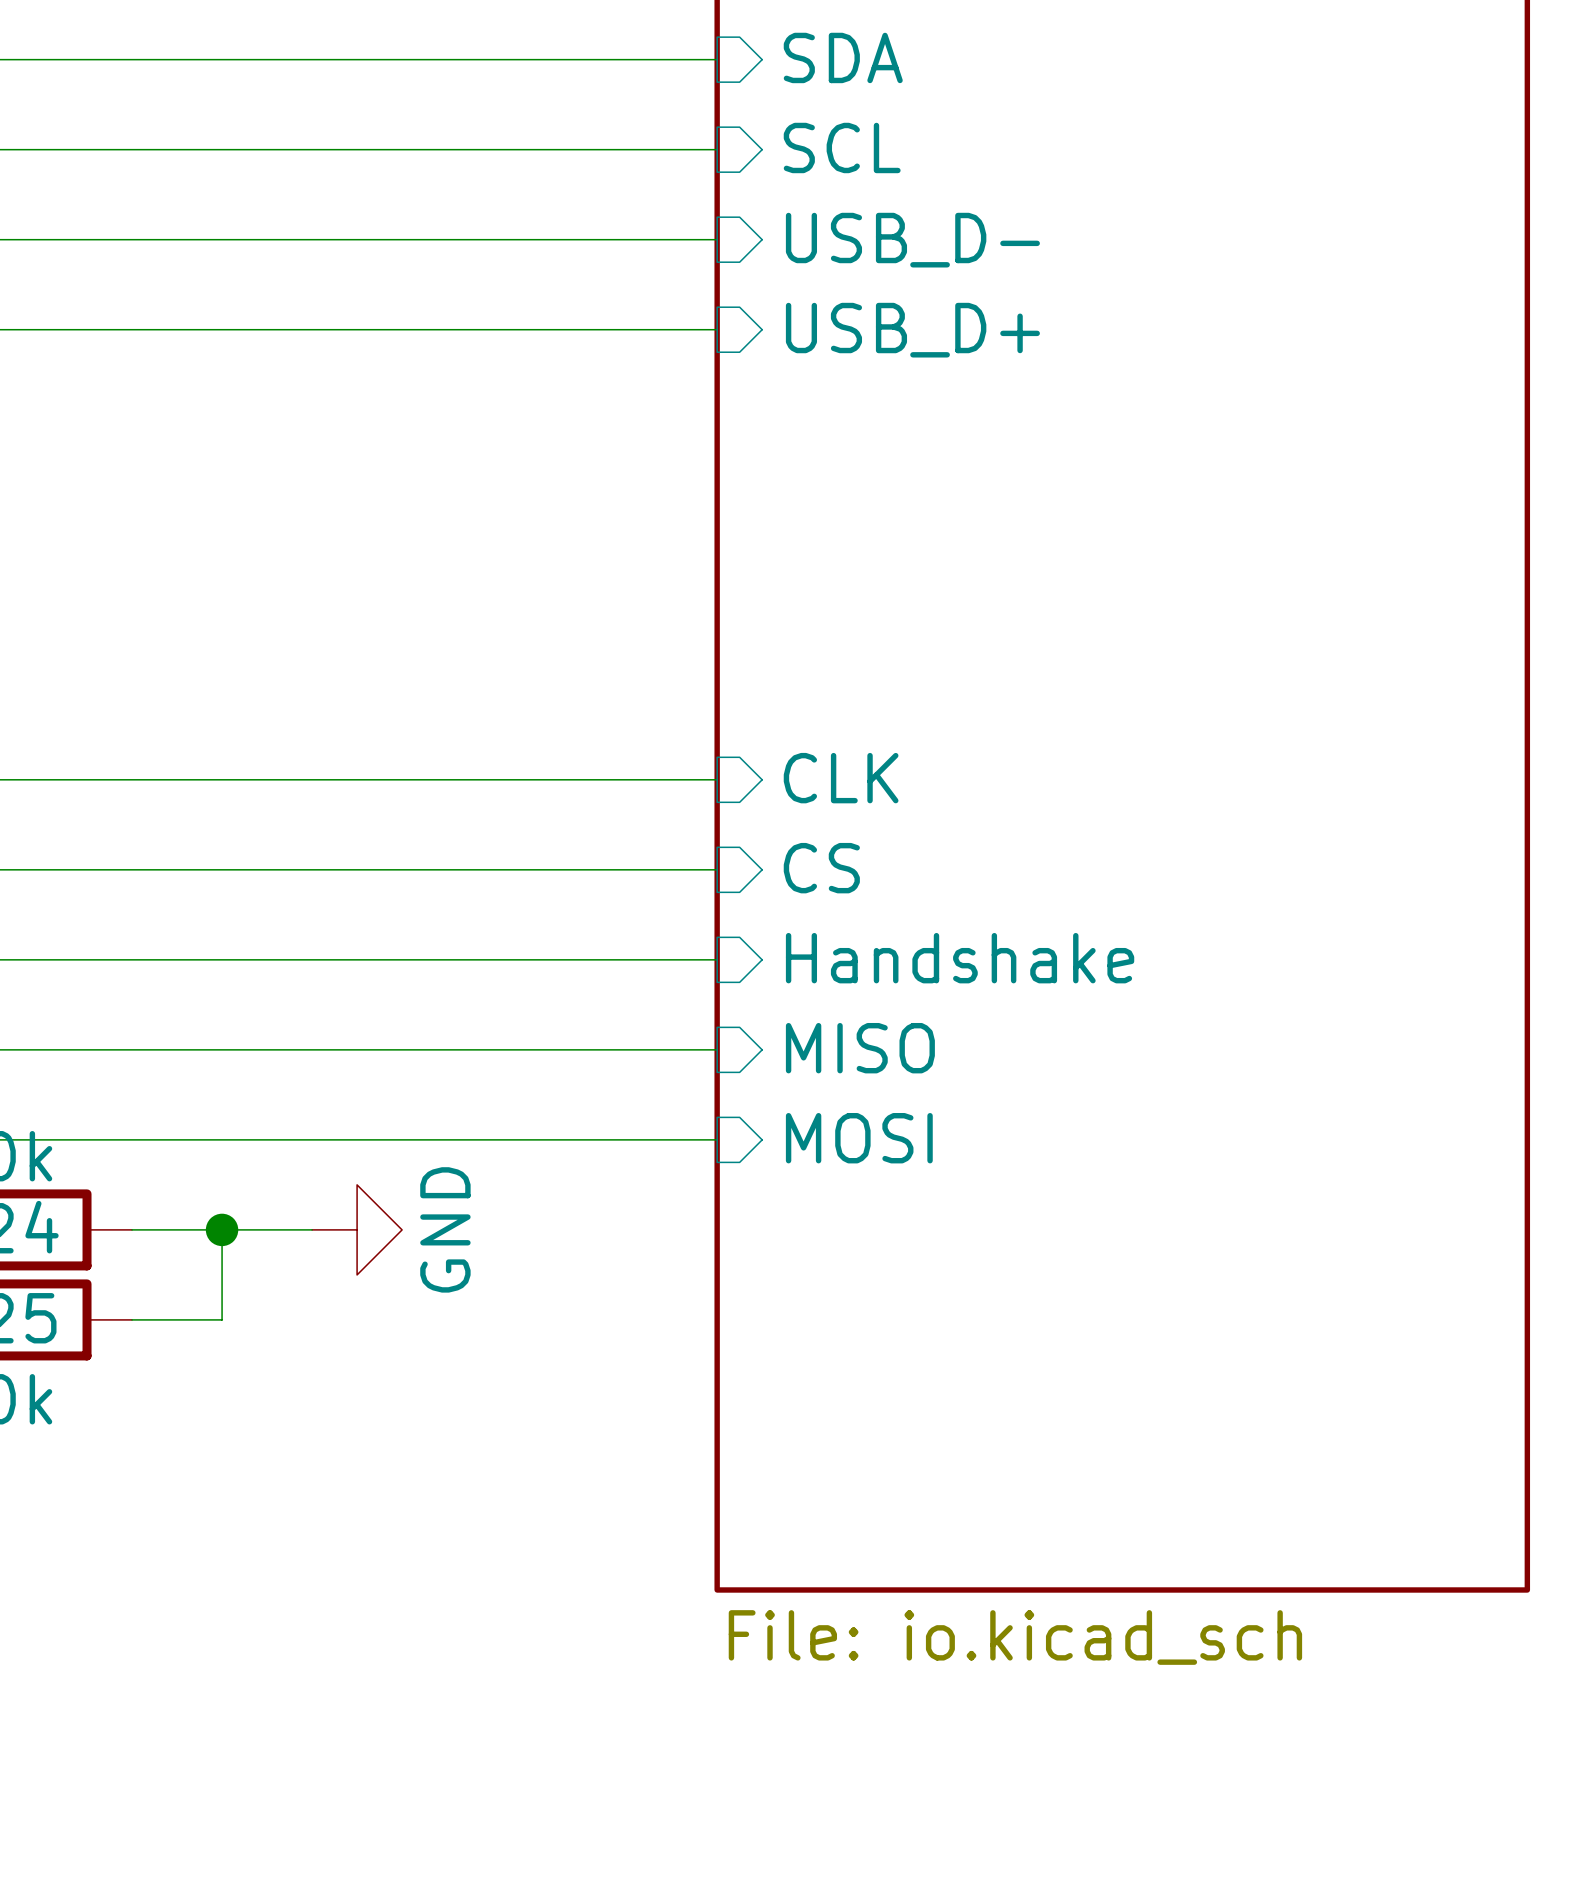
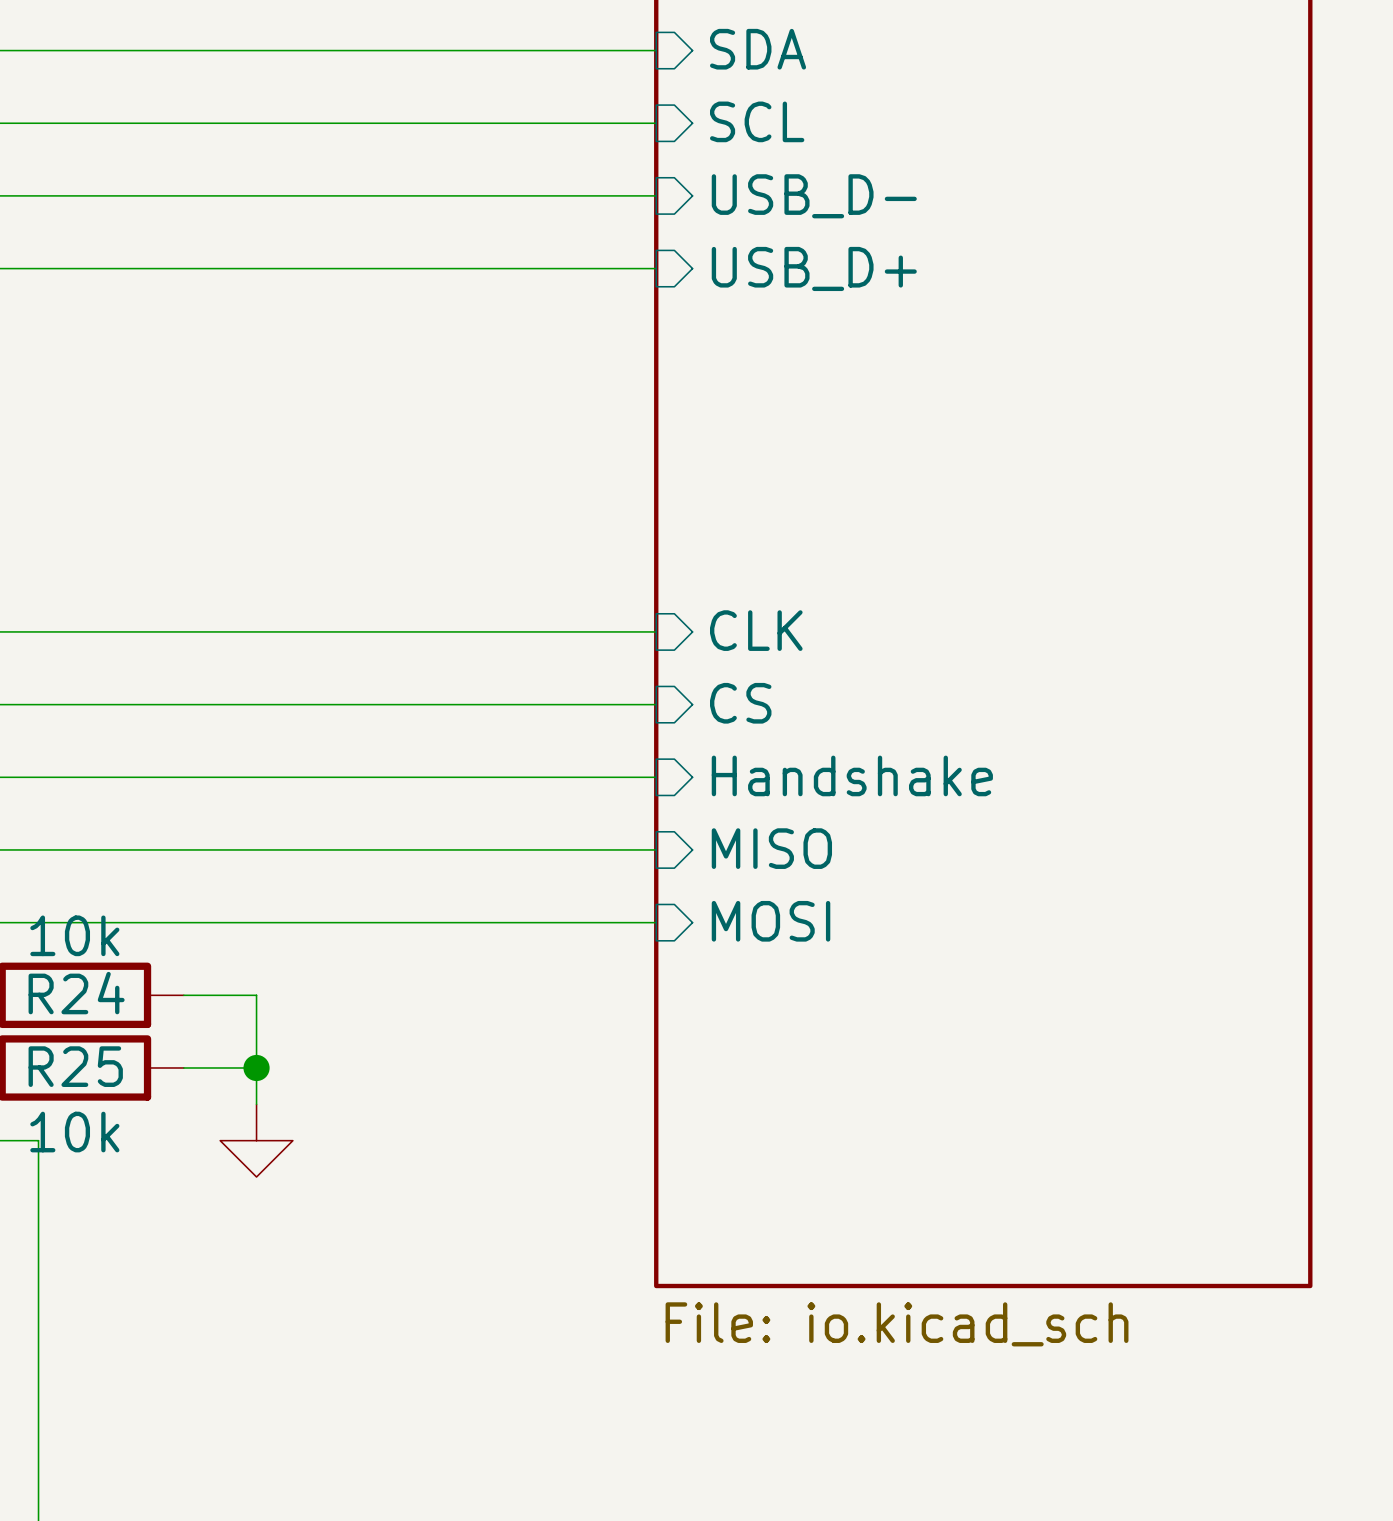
wire: (222, 1229) (312, 1229) -> none
junction position: (222, 1229) -> (256, 1067)
power symbol: GND (357, 1229) -> none
wire: none -> (256, 1067) (256, 1104)
power symbol: none -> (256, 1140)

